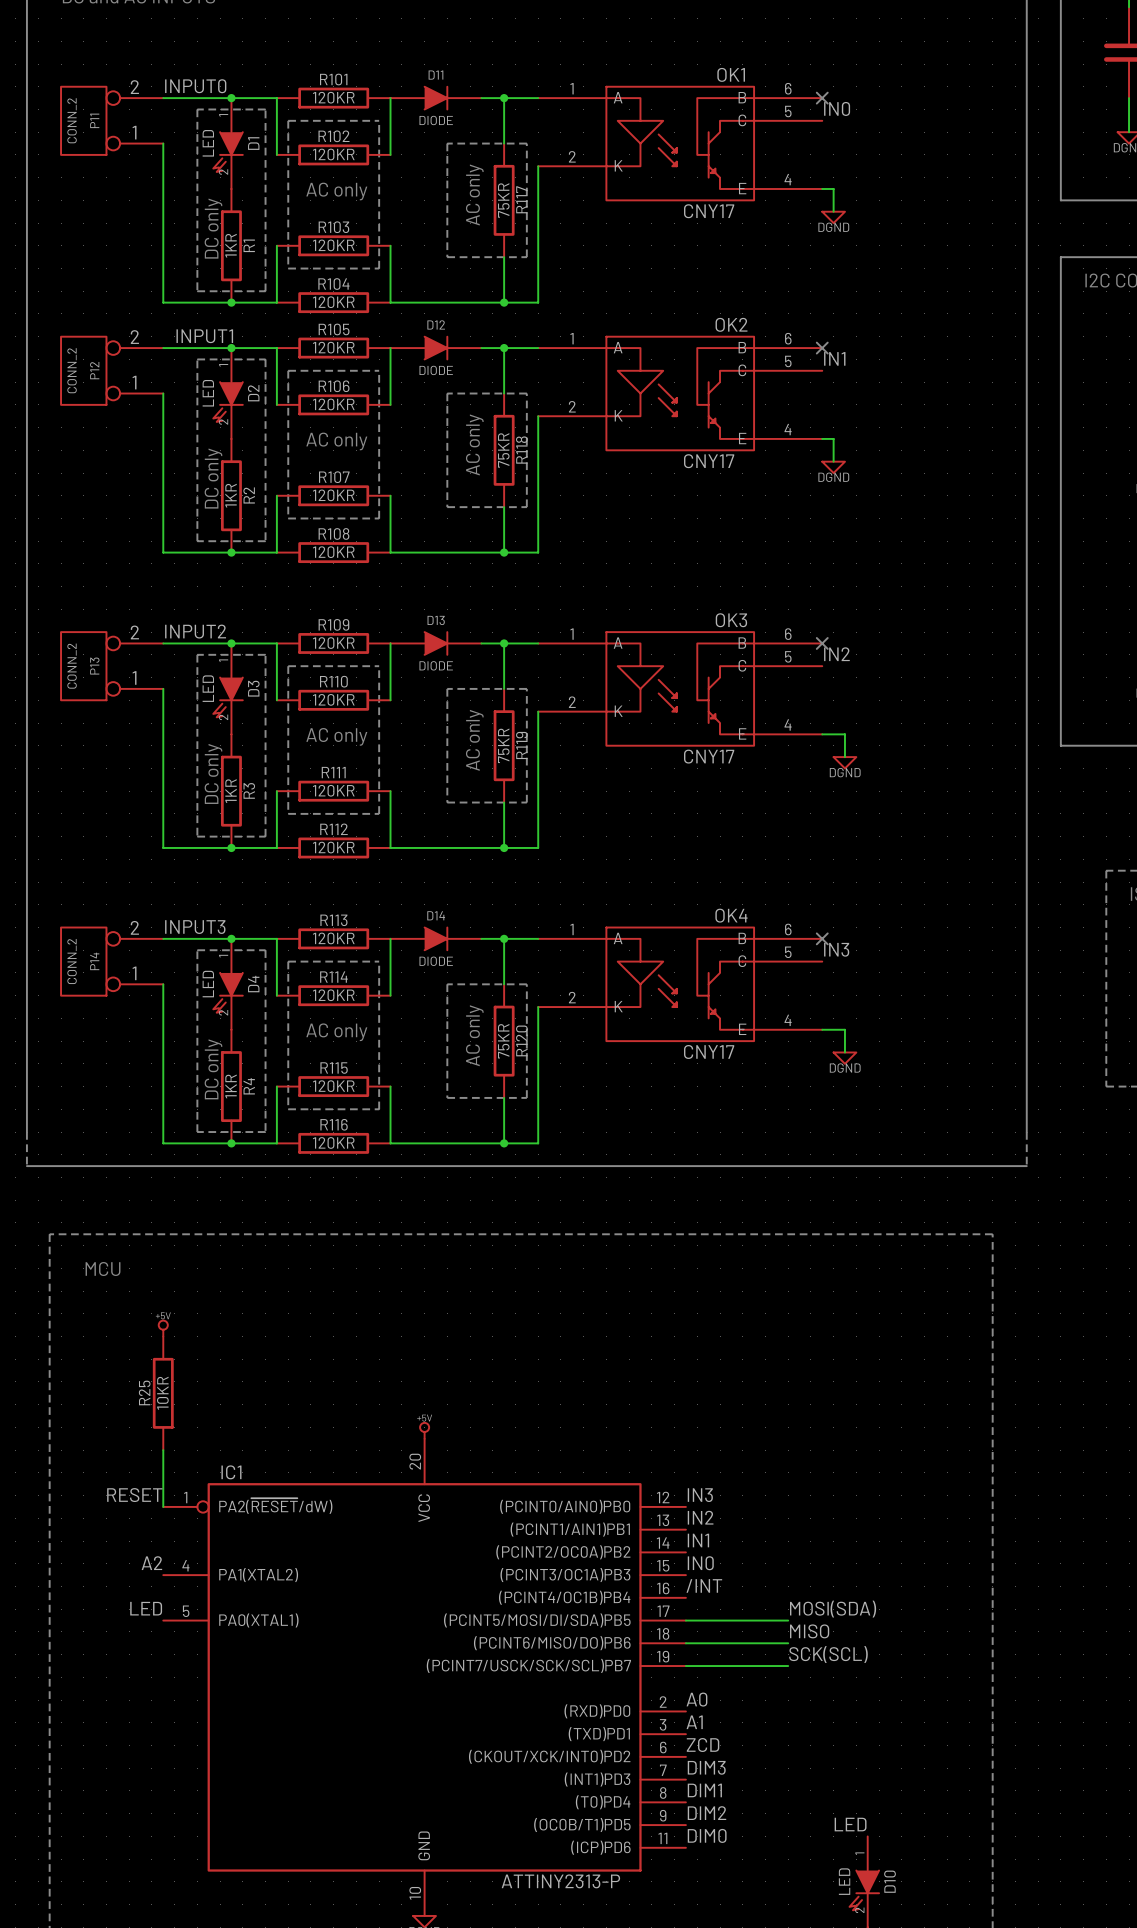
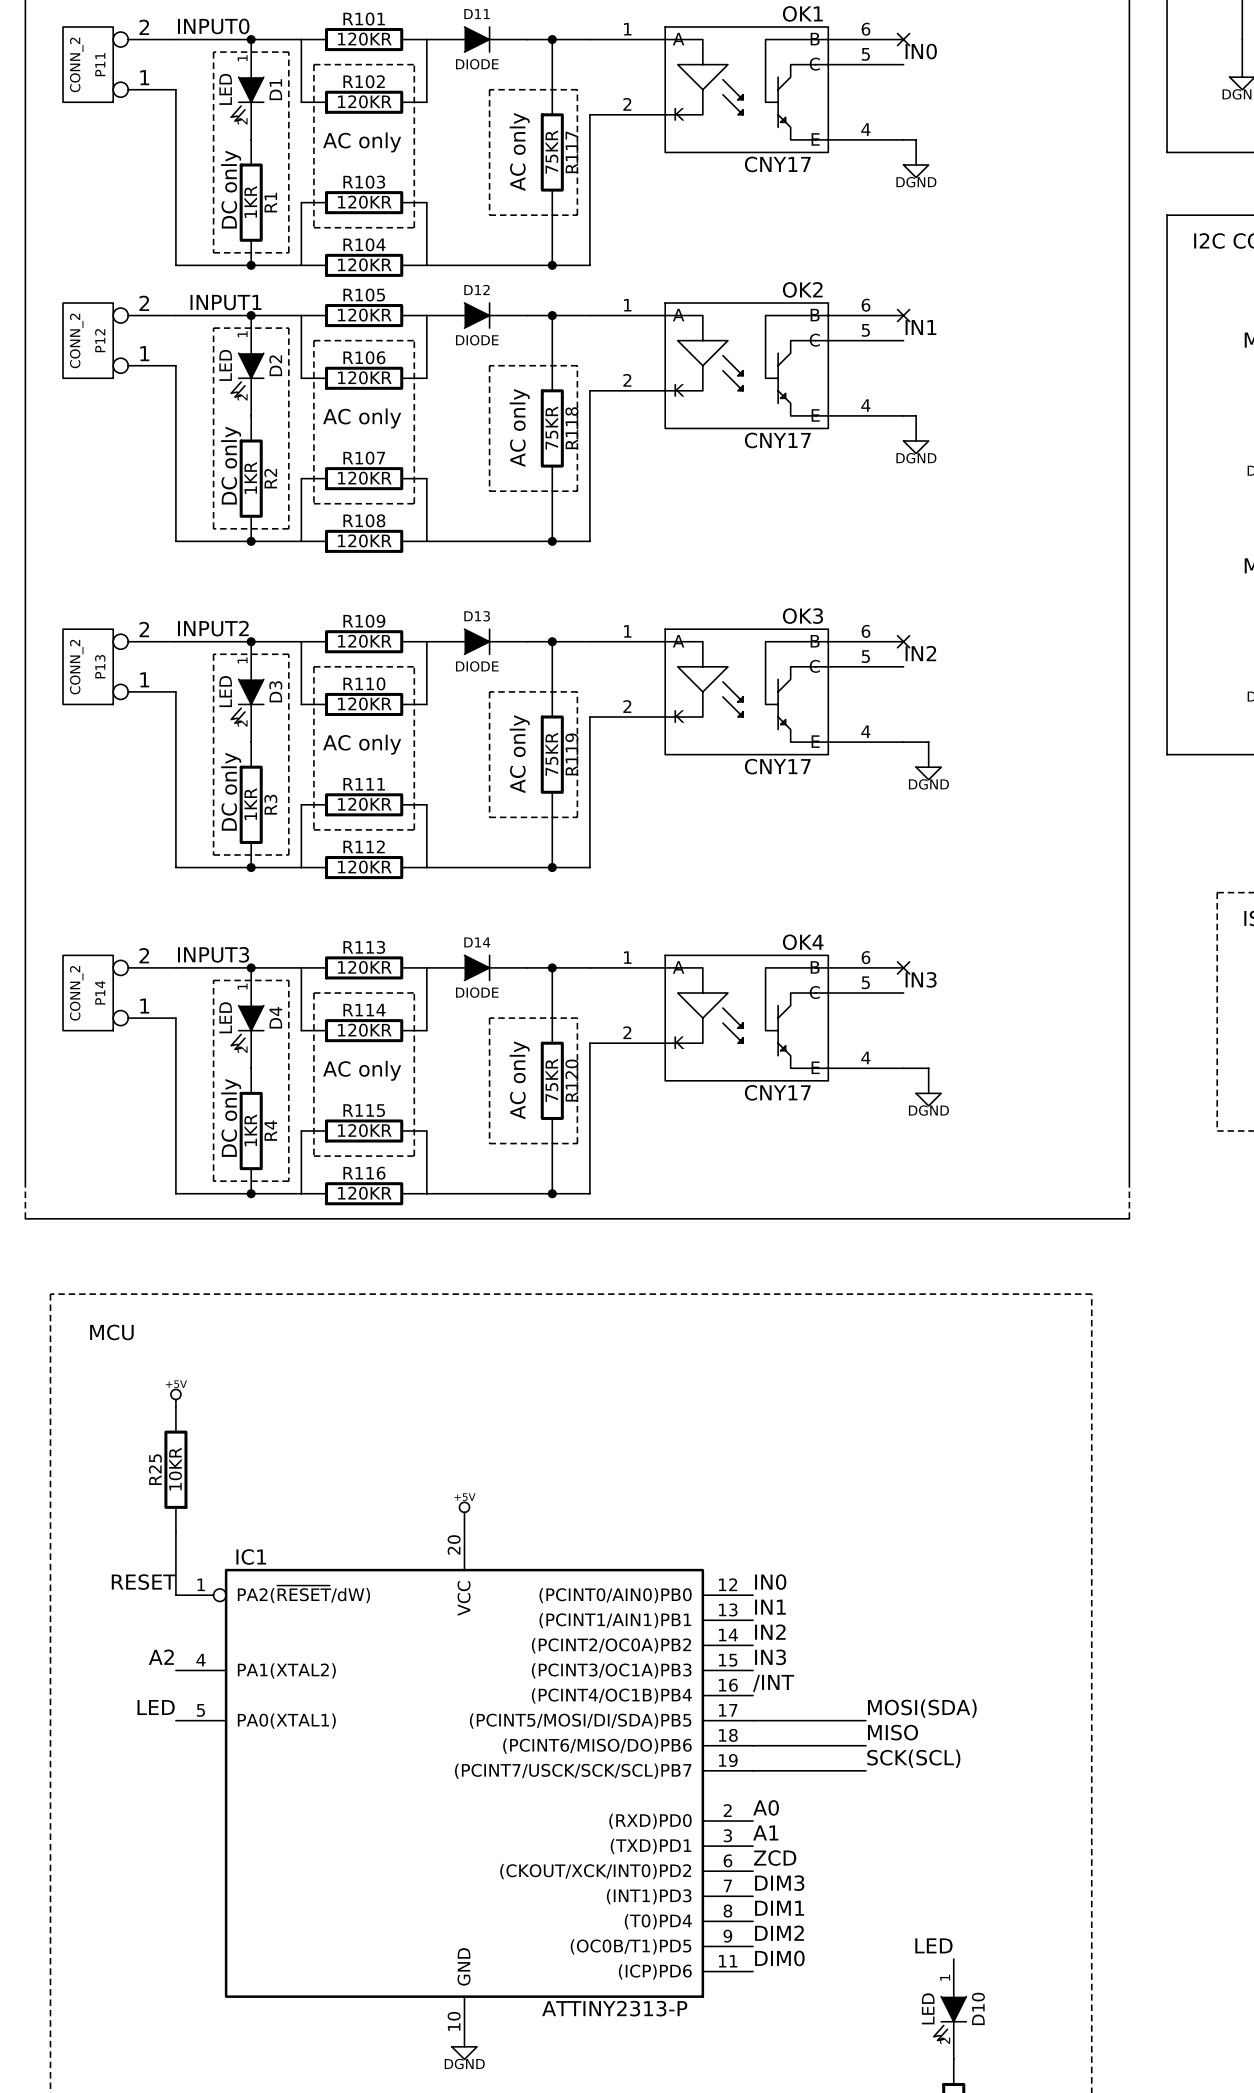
label: IN3 (700, 1495) -> IN0 (770, 1582)
label: IN2 (700, 1517) -> IN1 (770, 1607)
label: IN1 (698, 1540) -> IN2 (770, 1632)
label: IN0 (700, 1563) -> IN3 (770, 1657)

